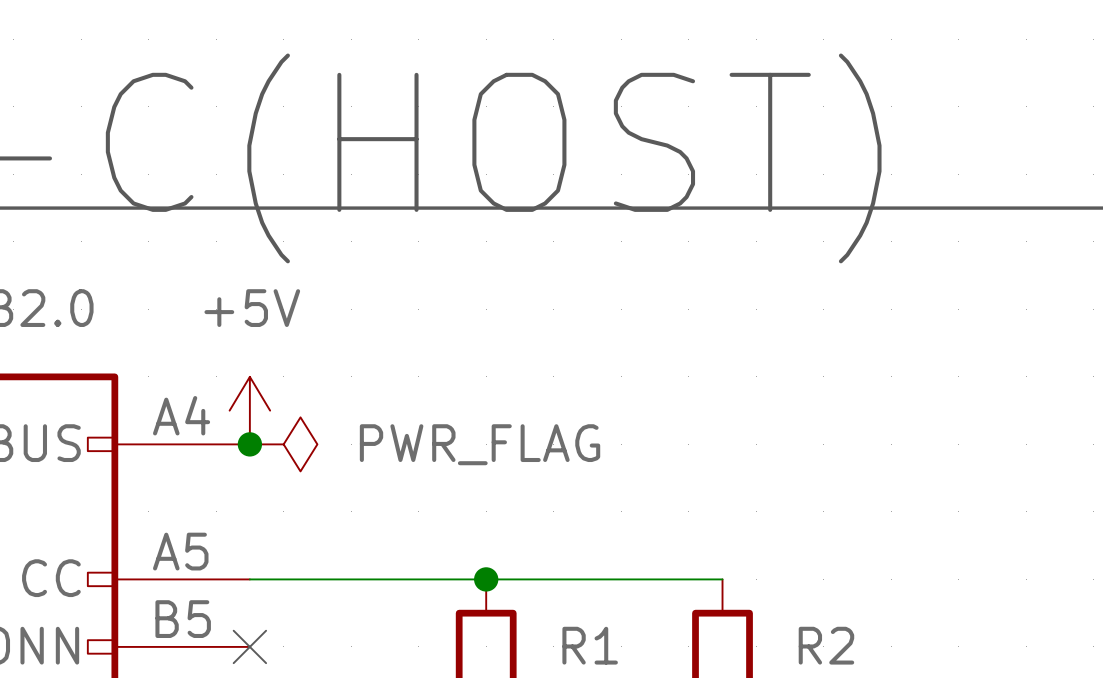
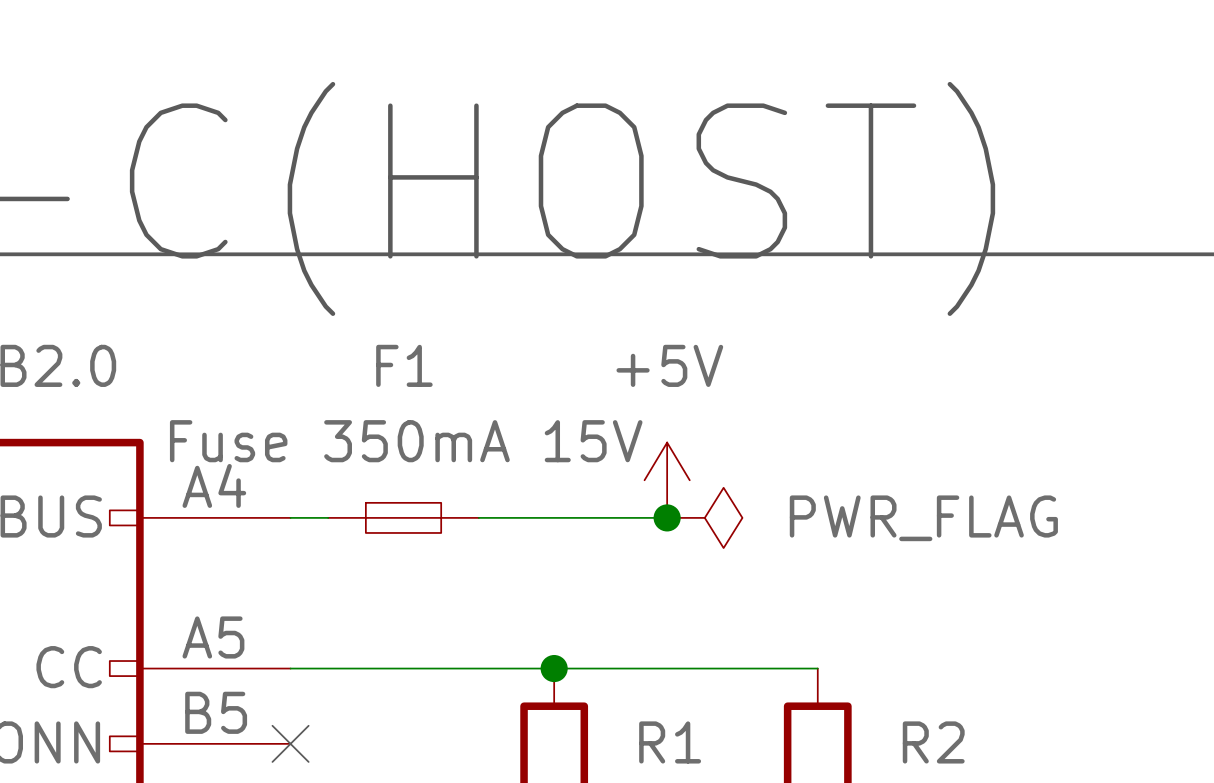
power symbol position: +5V (249, 410) -> +5V (667, 480)
junction: (249, 444) -> none
power symbol position: PWR_FLAG (283, 444) -> PWR_FLAG (704, 517)
F1: none -> Fuse 350mA 15V (403, 517)
wire: none -> (478, 517) (667, 517)
junction: none -> (667, 517)

